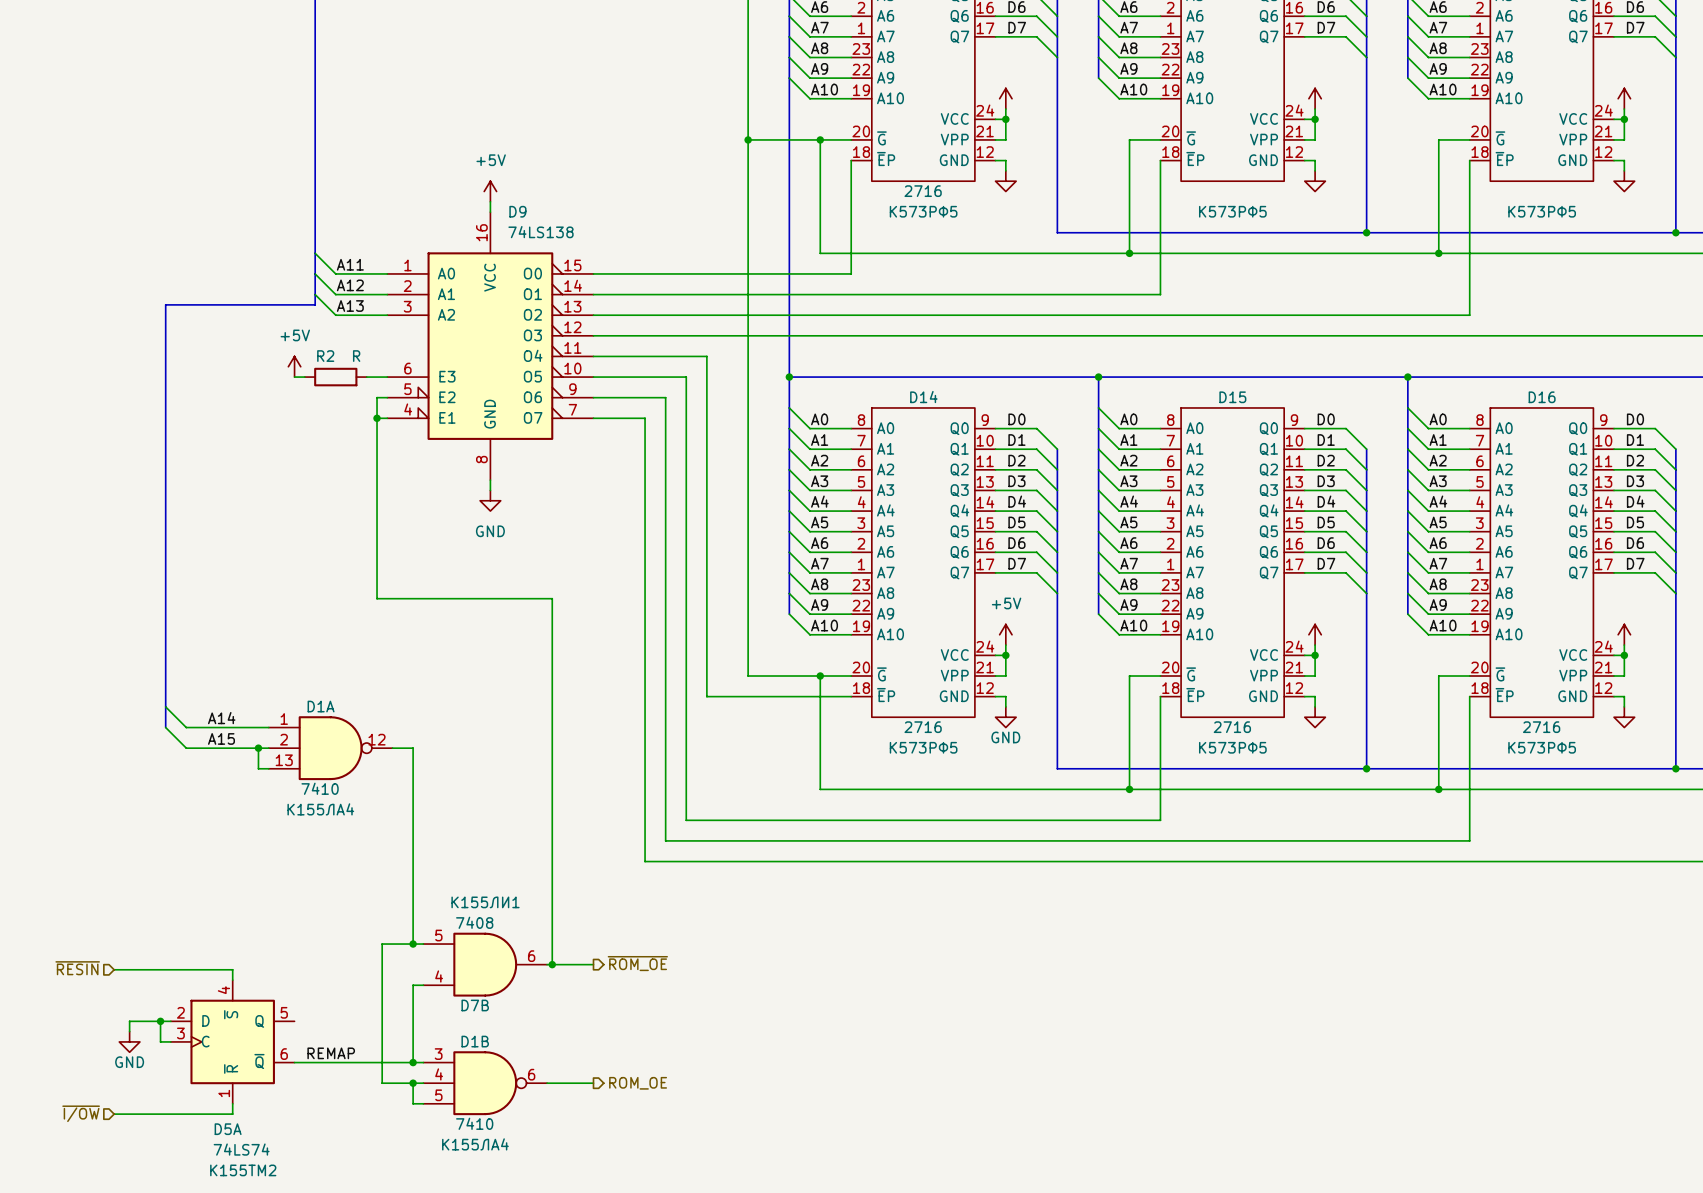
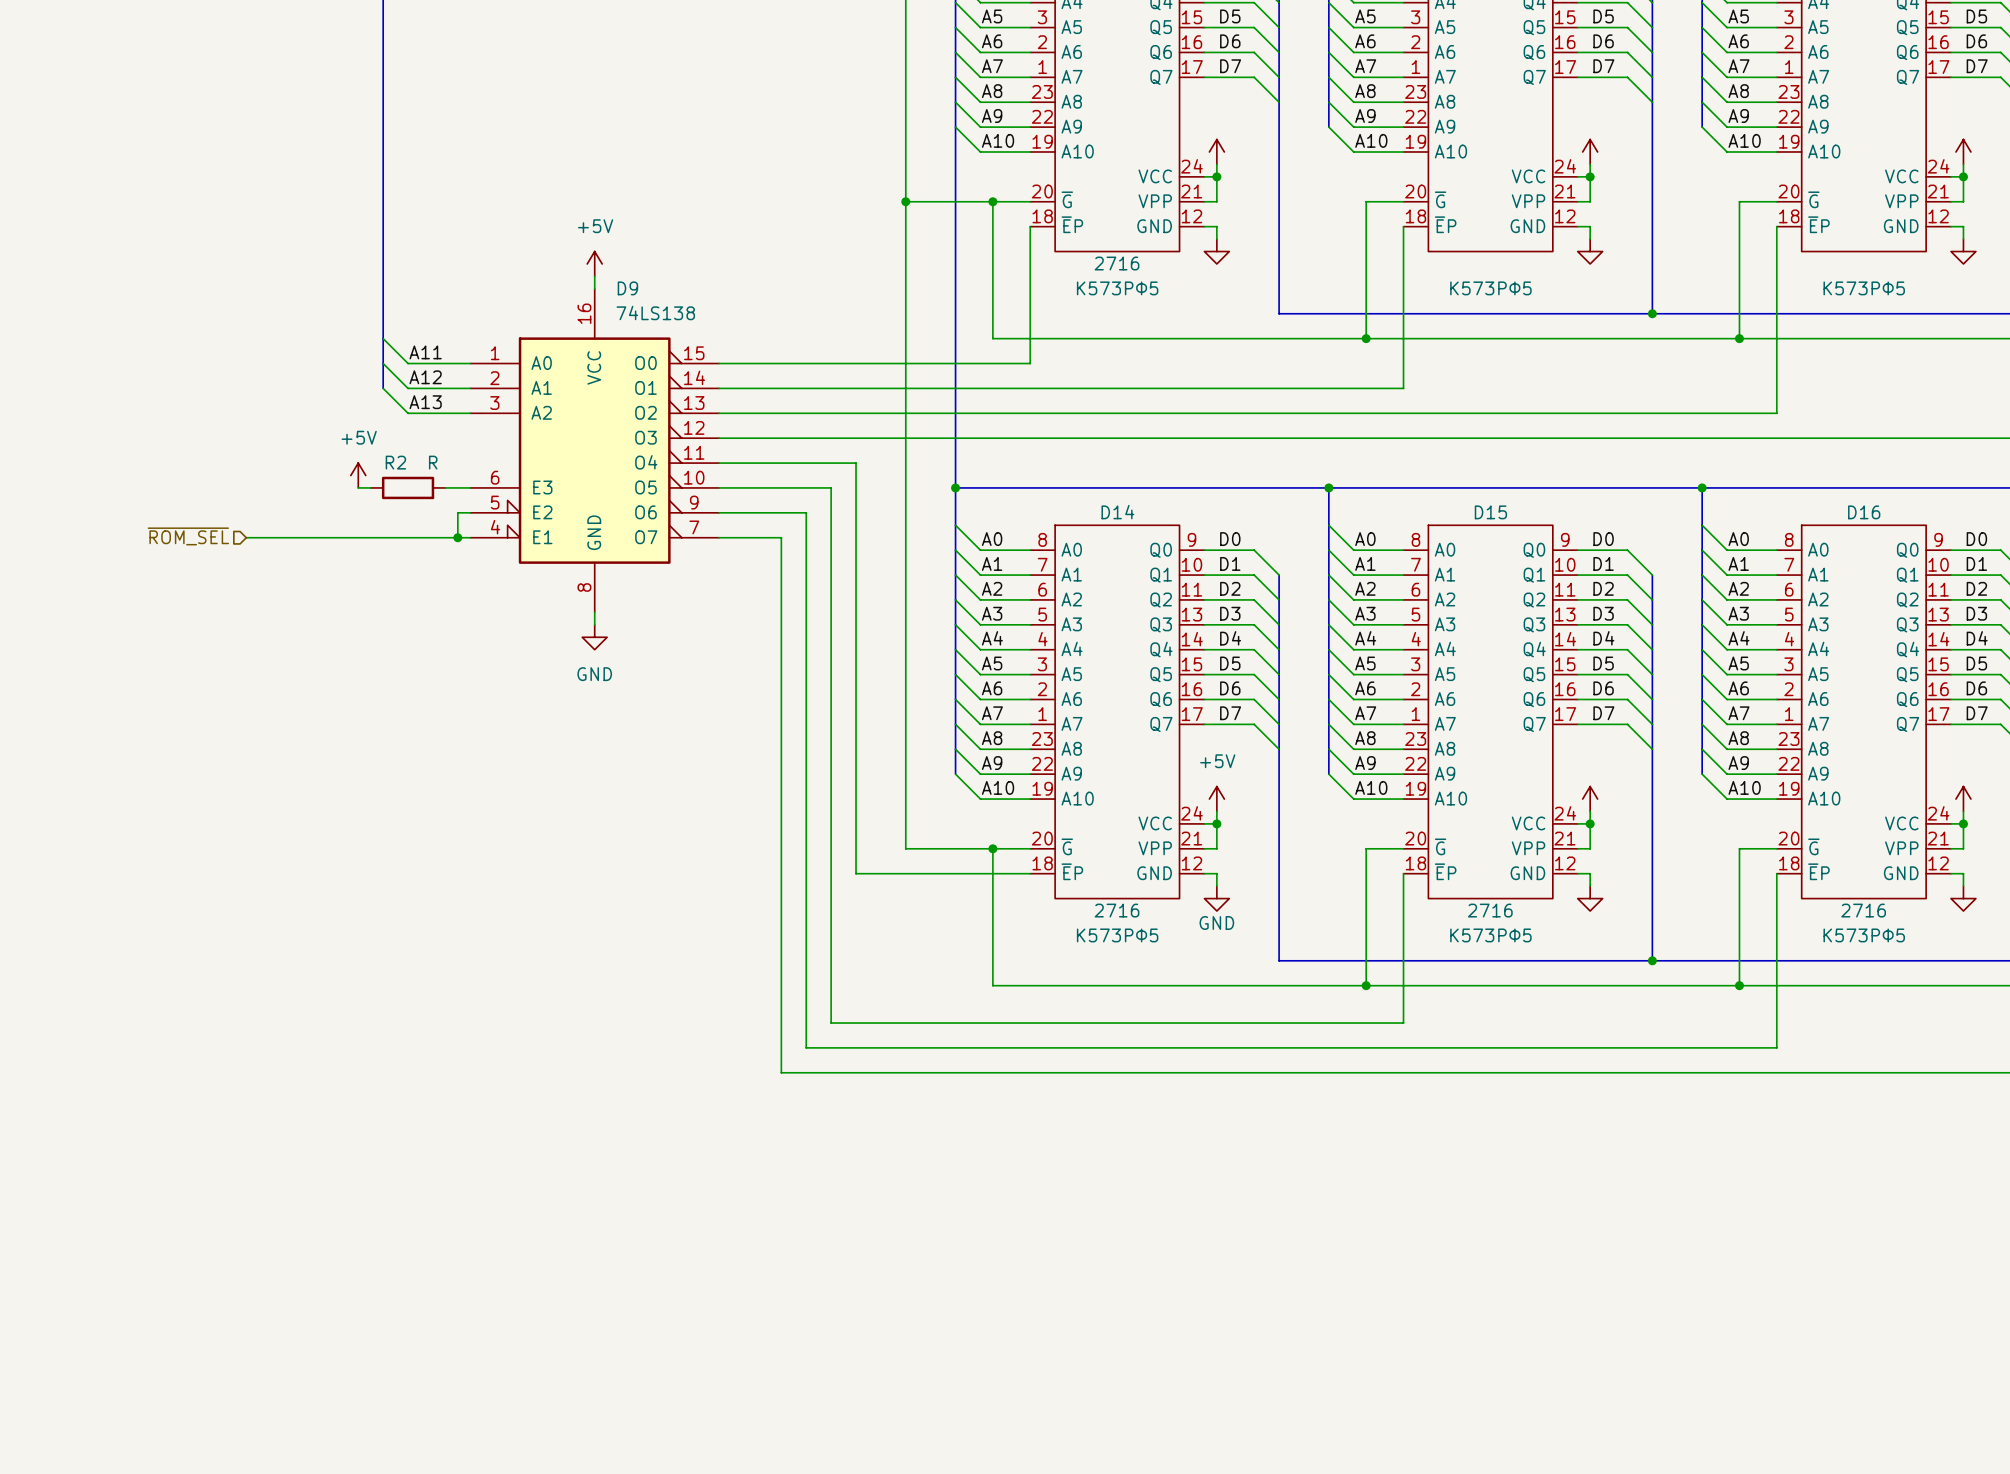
bus: (315, 294) (315, 304) (165, 304) (165, 727) -> none
hierarchical label: none -> ~{ROM_SEL} (188, 536)
wire: (377, 418) (377, 598) (552, 598) (552, 964) -> (457, 537) (246, 537)
wire: (165, 706) (186, 727) (268, 727) -> none
label: A14 (221, 718) -> none
wire: (165, 727) (186, 748) (268, 748) -> none
label: A15 (221, 738) -> none
wire: (258, 748) (258, 768) (268, 768) -> none
junction: (258, 748) -> none
D1A: 7410 (330, 748) -> none
wire: (392, 748) (413, 748) (413, 944) -> none
junction: (413, 944) -> none
wire: (423, 944) (382, 944) (382, 1083) (423, 1083) -> none
hierarchical label: ~{ROM_OE} (637, 963) -> none
D7B: 7408 (485, 964) -> none
wire: (547, 964) (593, 964) -> none
junction: (552, 964) -> none
hierarchical label: ~{RESIN} (77, 968) -> none
wire: (114, 969) (232, 969) (232, 980) -> none
wire: (423, 985) (413, 985) (413, 1062) -> none
wire: (160, 1021) (160, 1041) (170, 1041) -> none
junction: (160, 1021) -> none
wire: (170, 1021) (129, 1021) (129, 1031) -> none
power symbol: GND (129, 1041) -> none
D5A: 74LS74 (232, 1041) -> none
label: REMAP (331, 1053) -> none
wire: (294, 1062) (423, 1062) -> none
junction: (413, 1062) -> none
wire: (413, 1083) (413, 1103) (423, 1103) -> none
junction: (413, 1083) -> none
D1B: 7410 (485, 1083) -> none
wire: (547, 1083) (593, 1083) -> none
hierarchical label: ROM_OE (638, 1083) -> none
wire: (232, 1103) (232, 1114) (114, 1114) -> none
hierarchical label: ~{I/OW} (81, 1113) -> none

